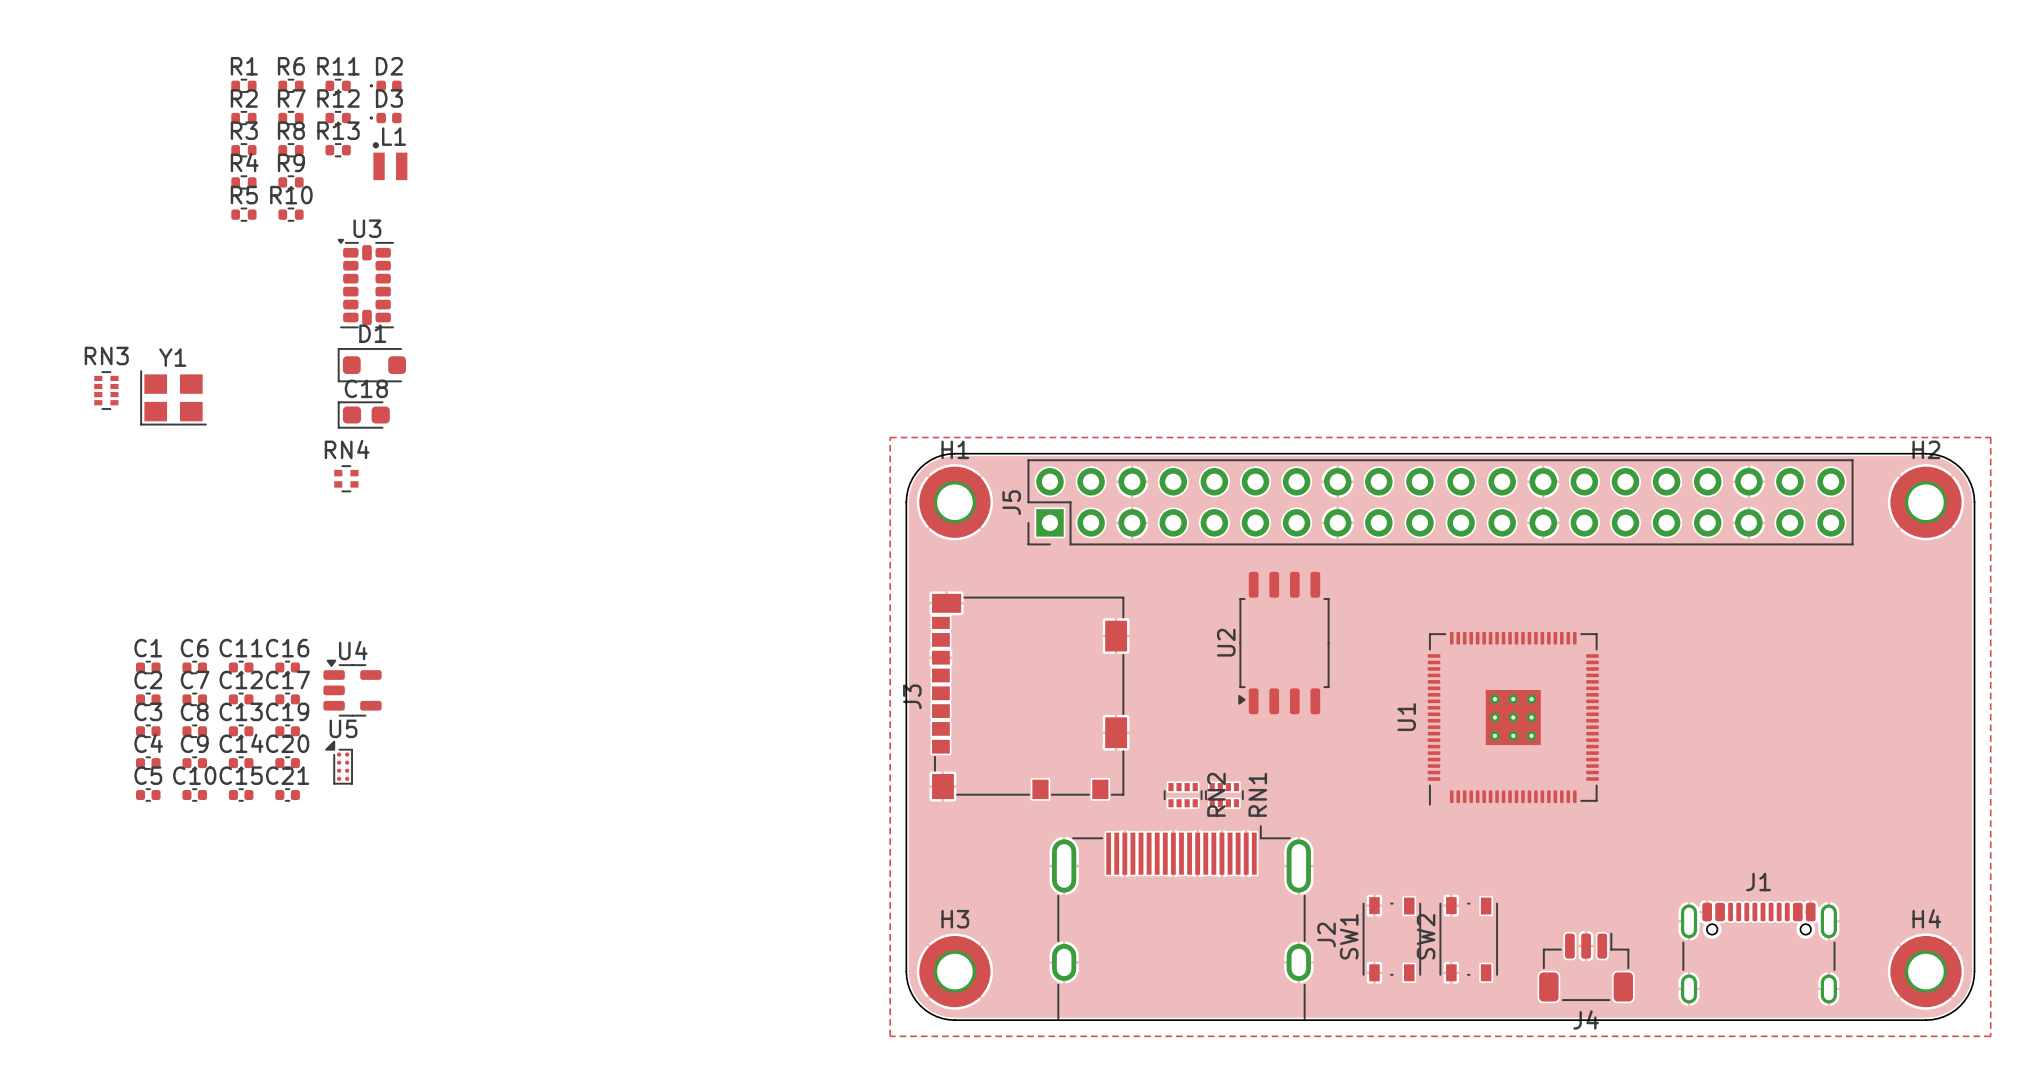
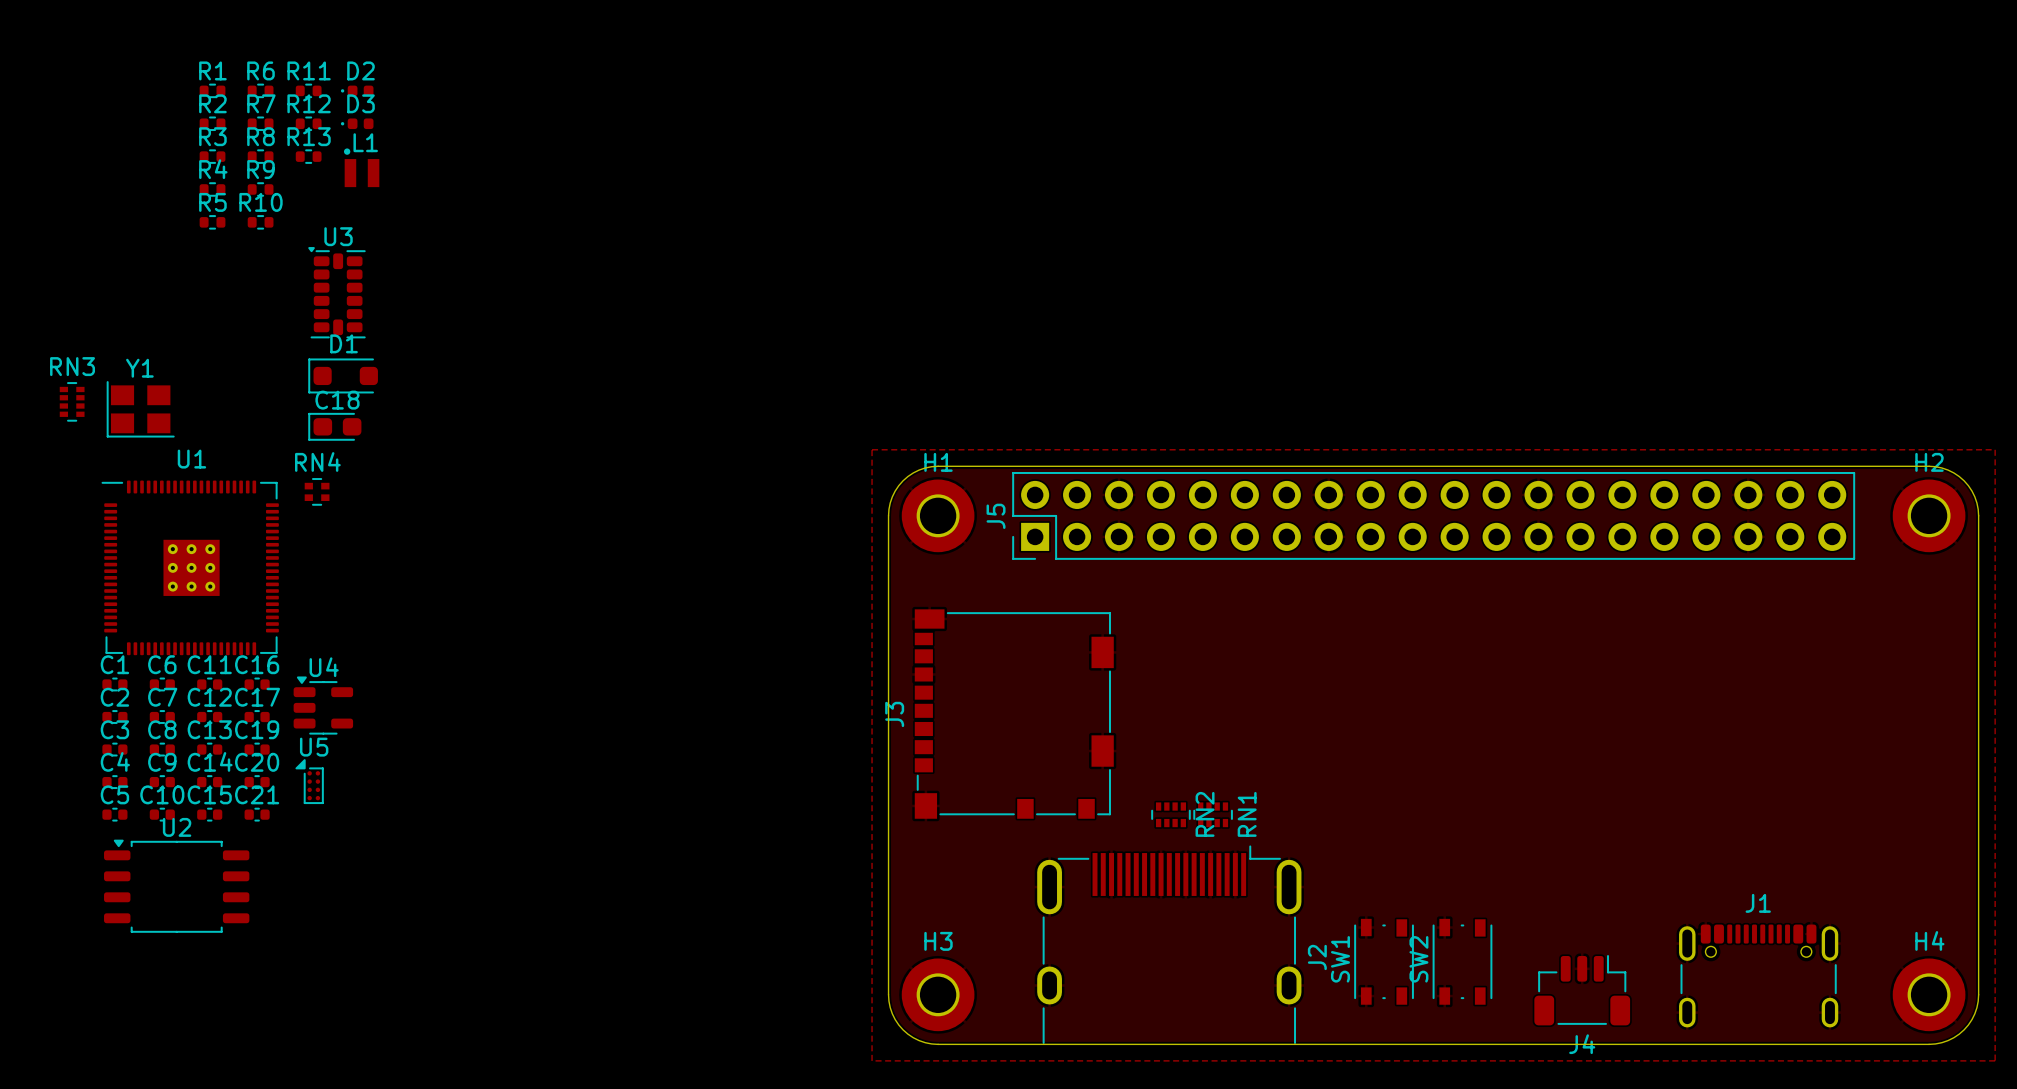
U2 rotation: 0° (1283, 643) -> 90° clockwise (176, 886)
U2 position: (1283, 643) -> (176, 886)
U1 rotation: 0° (1513, 718) -> 90° clockwise (190, 567)
U1 position: (1513, 718) -> (190, 567)

